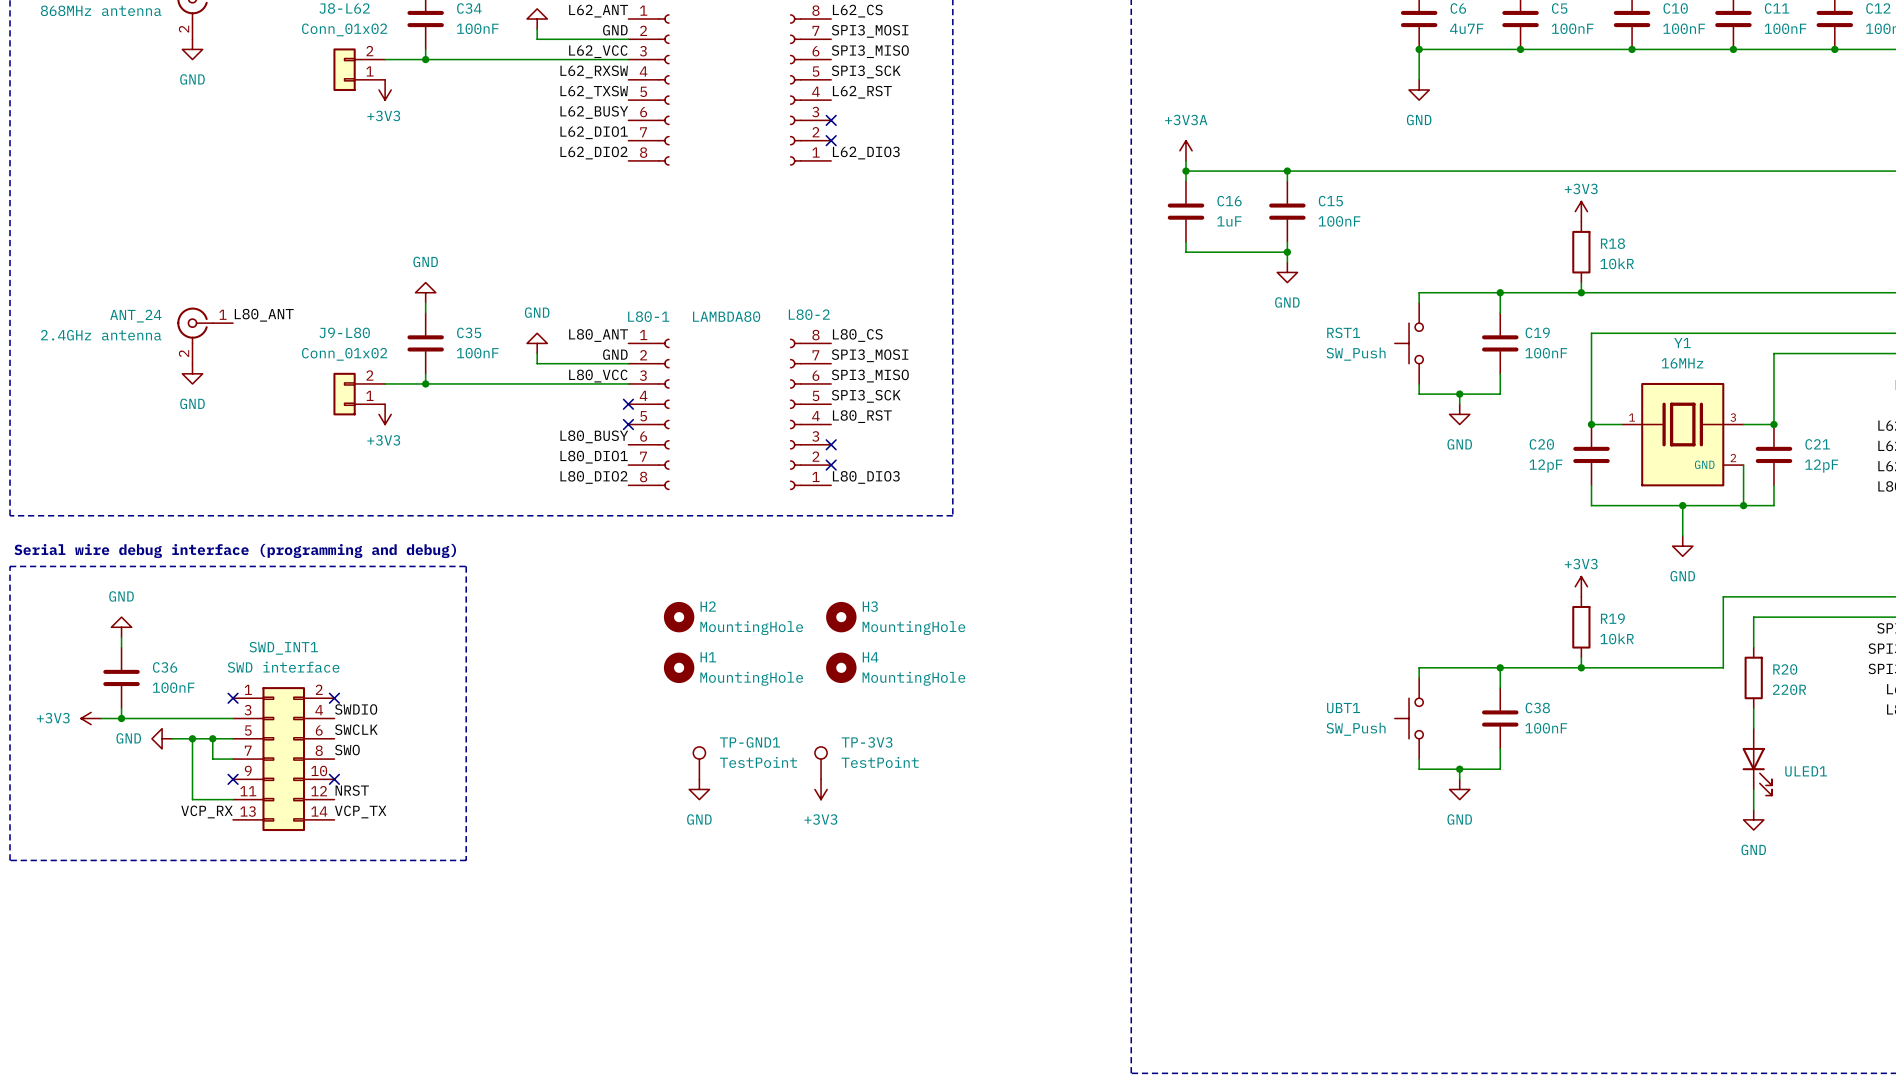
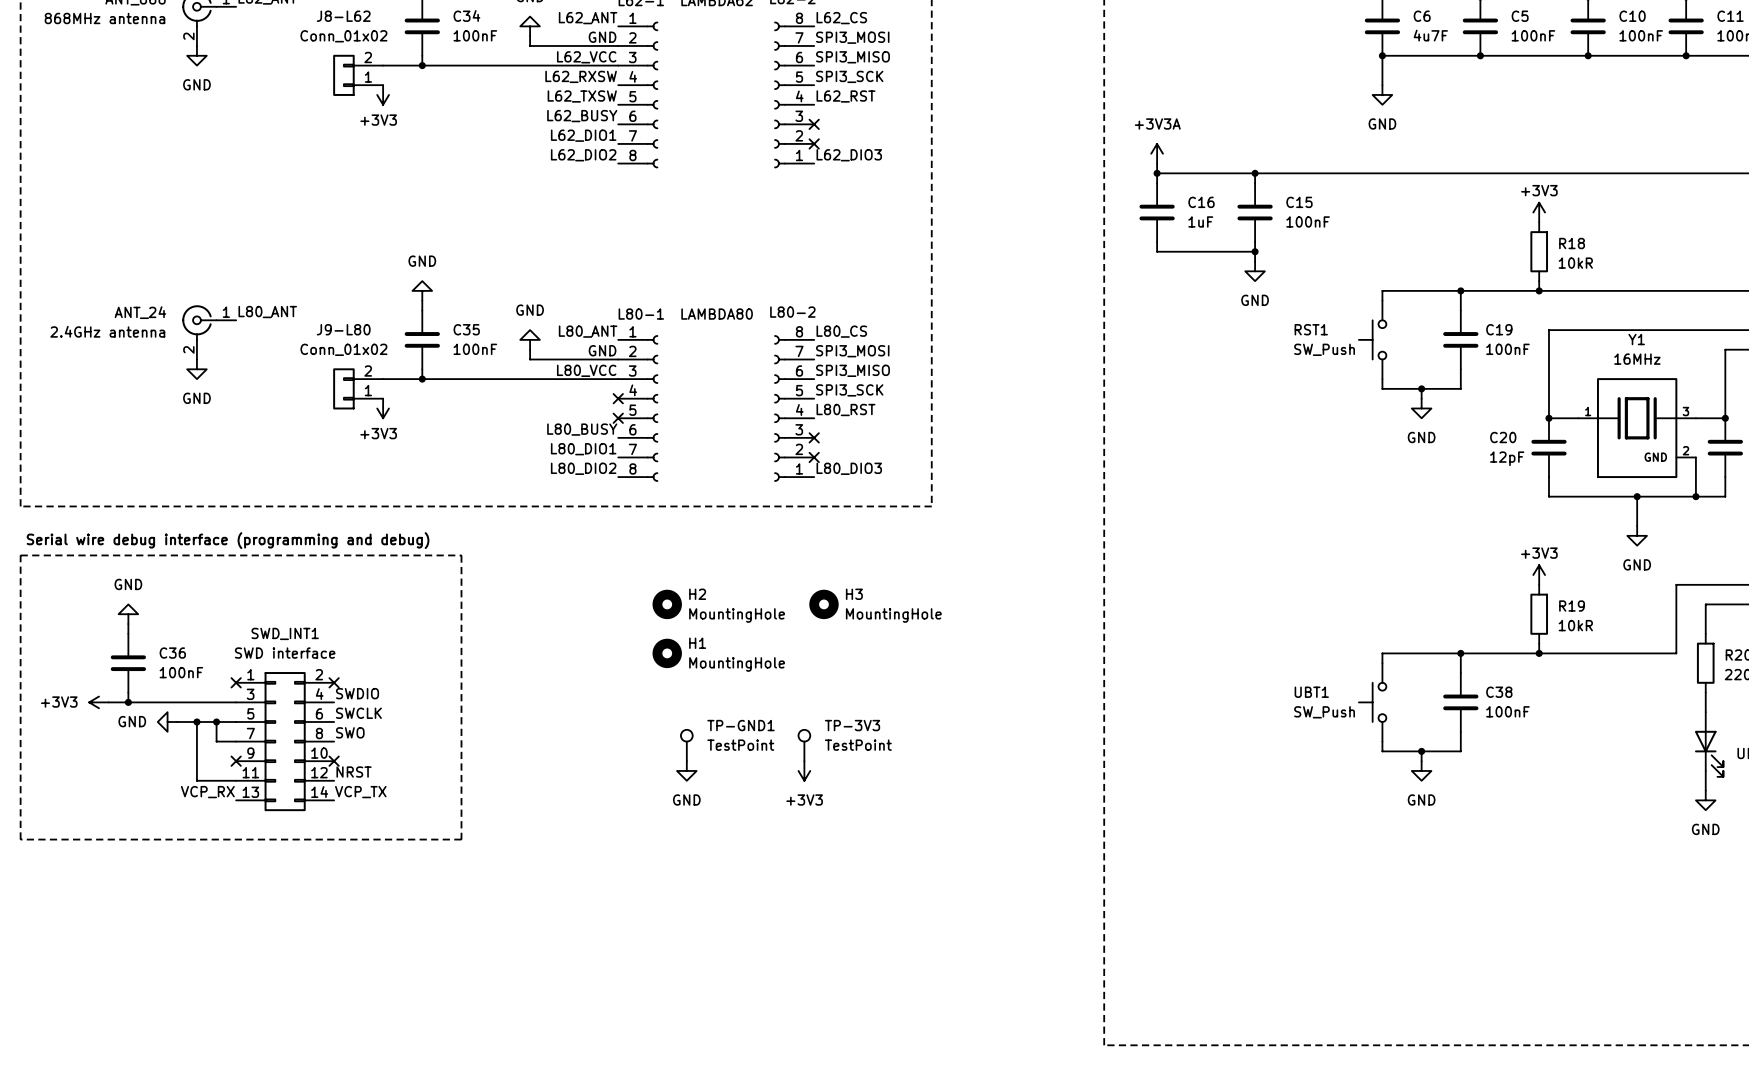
H4: MountingHole (841, 667) -> none

